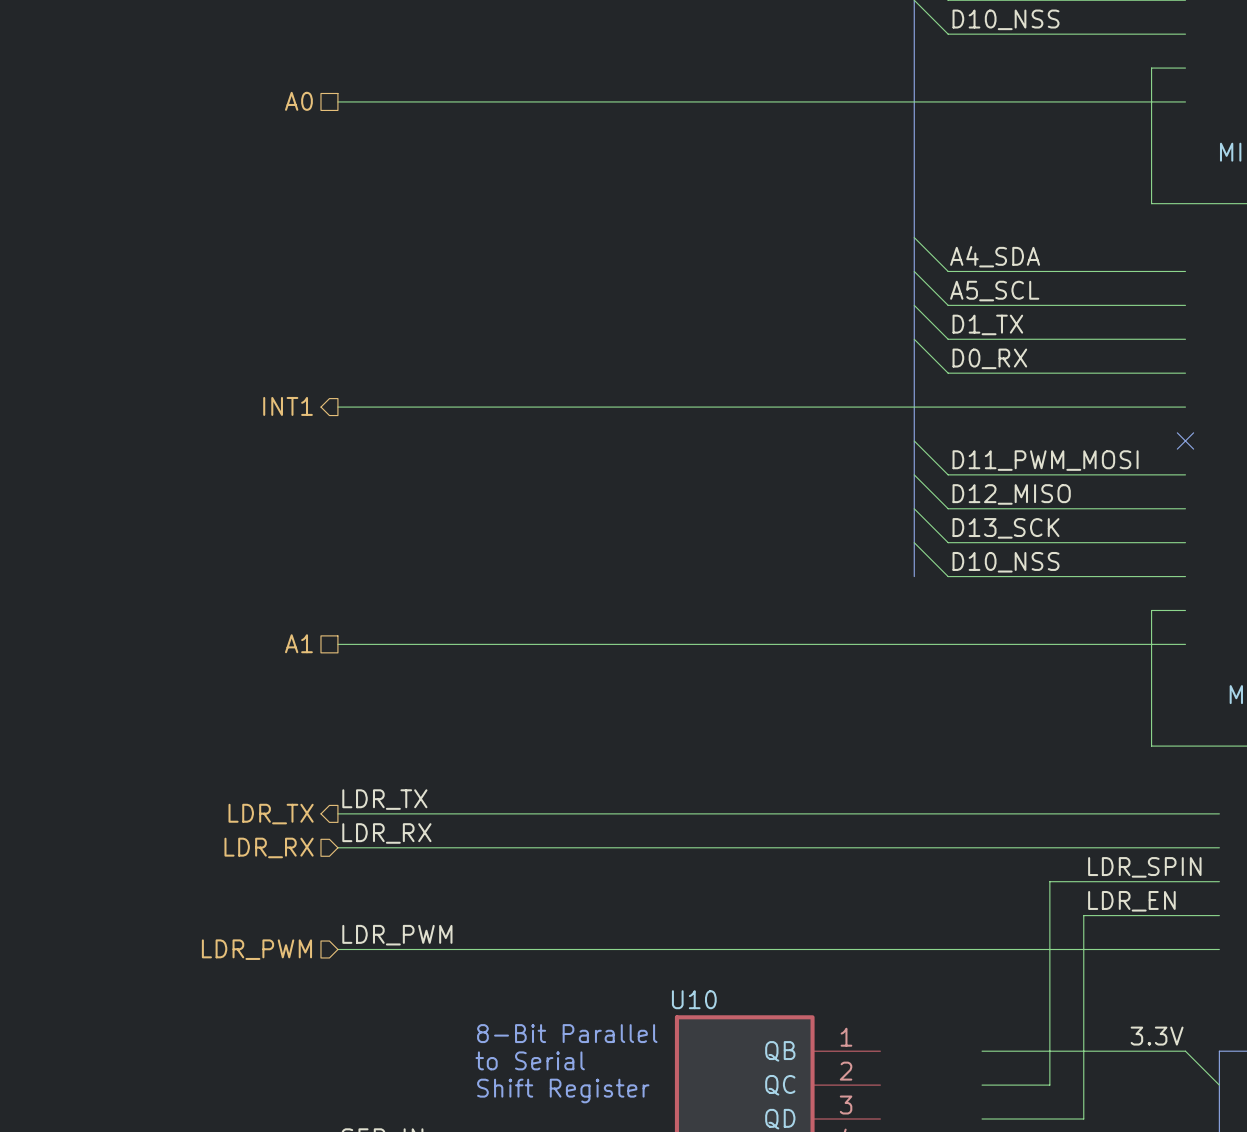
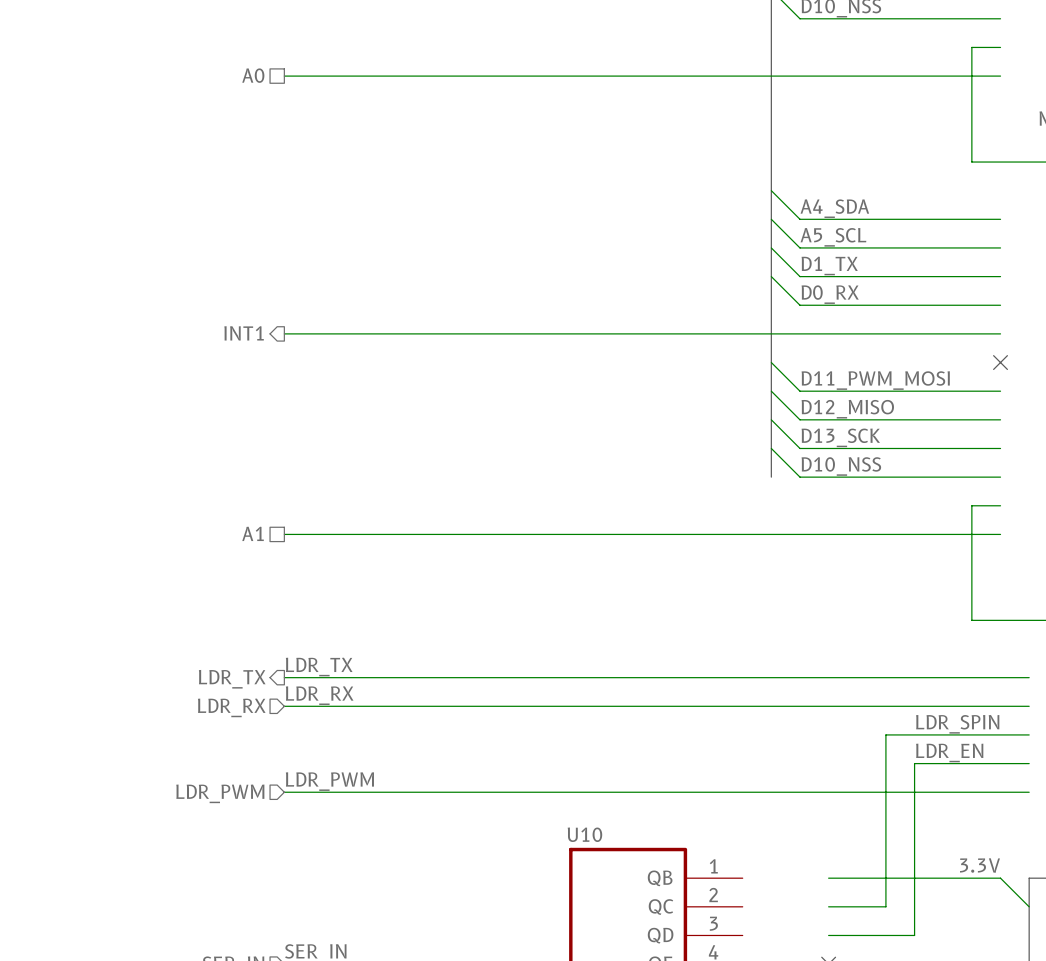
text: 8-Bit Parallel (567, 1033) -> none
text: to Serial (530, 1060) -> none
text: Shift Register (563, 1090) -> none

